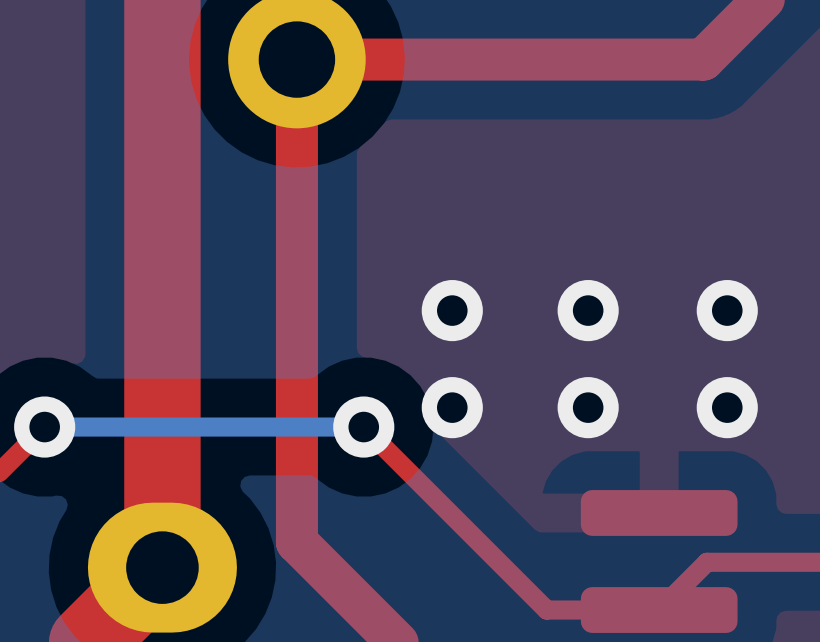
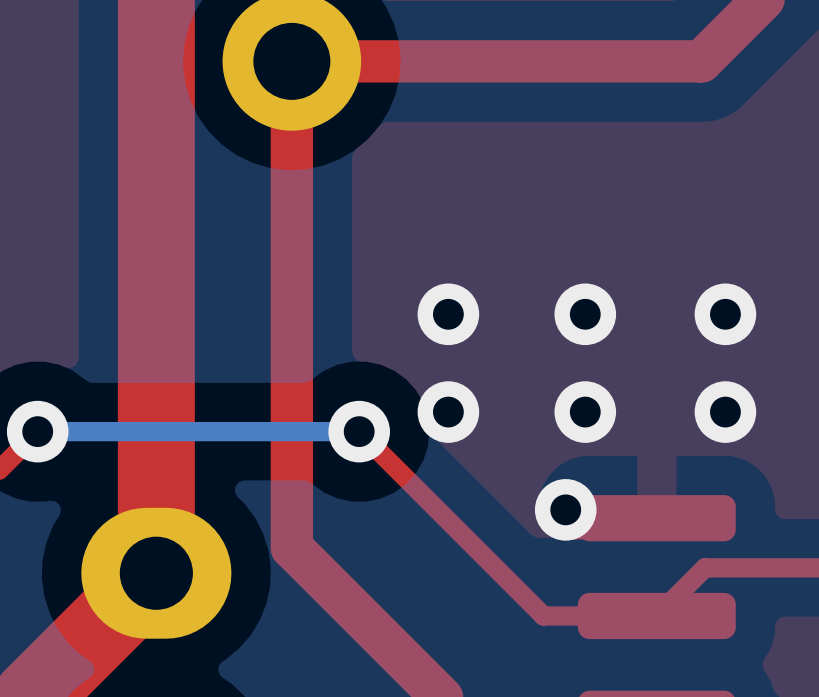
via: none -> (565, 509)

